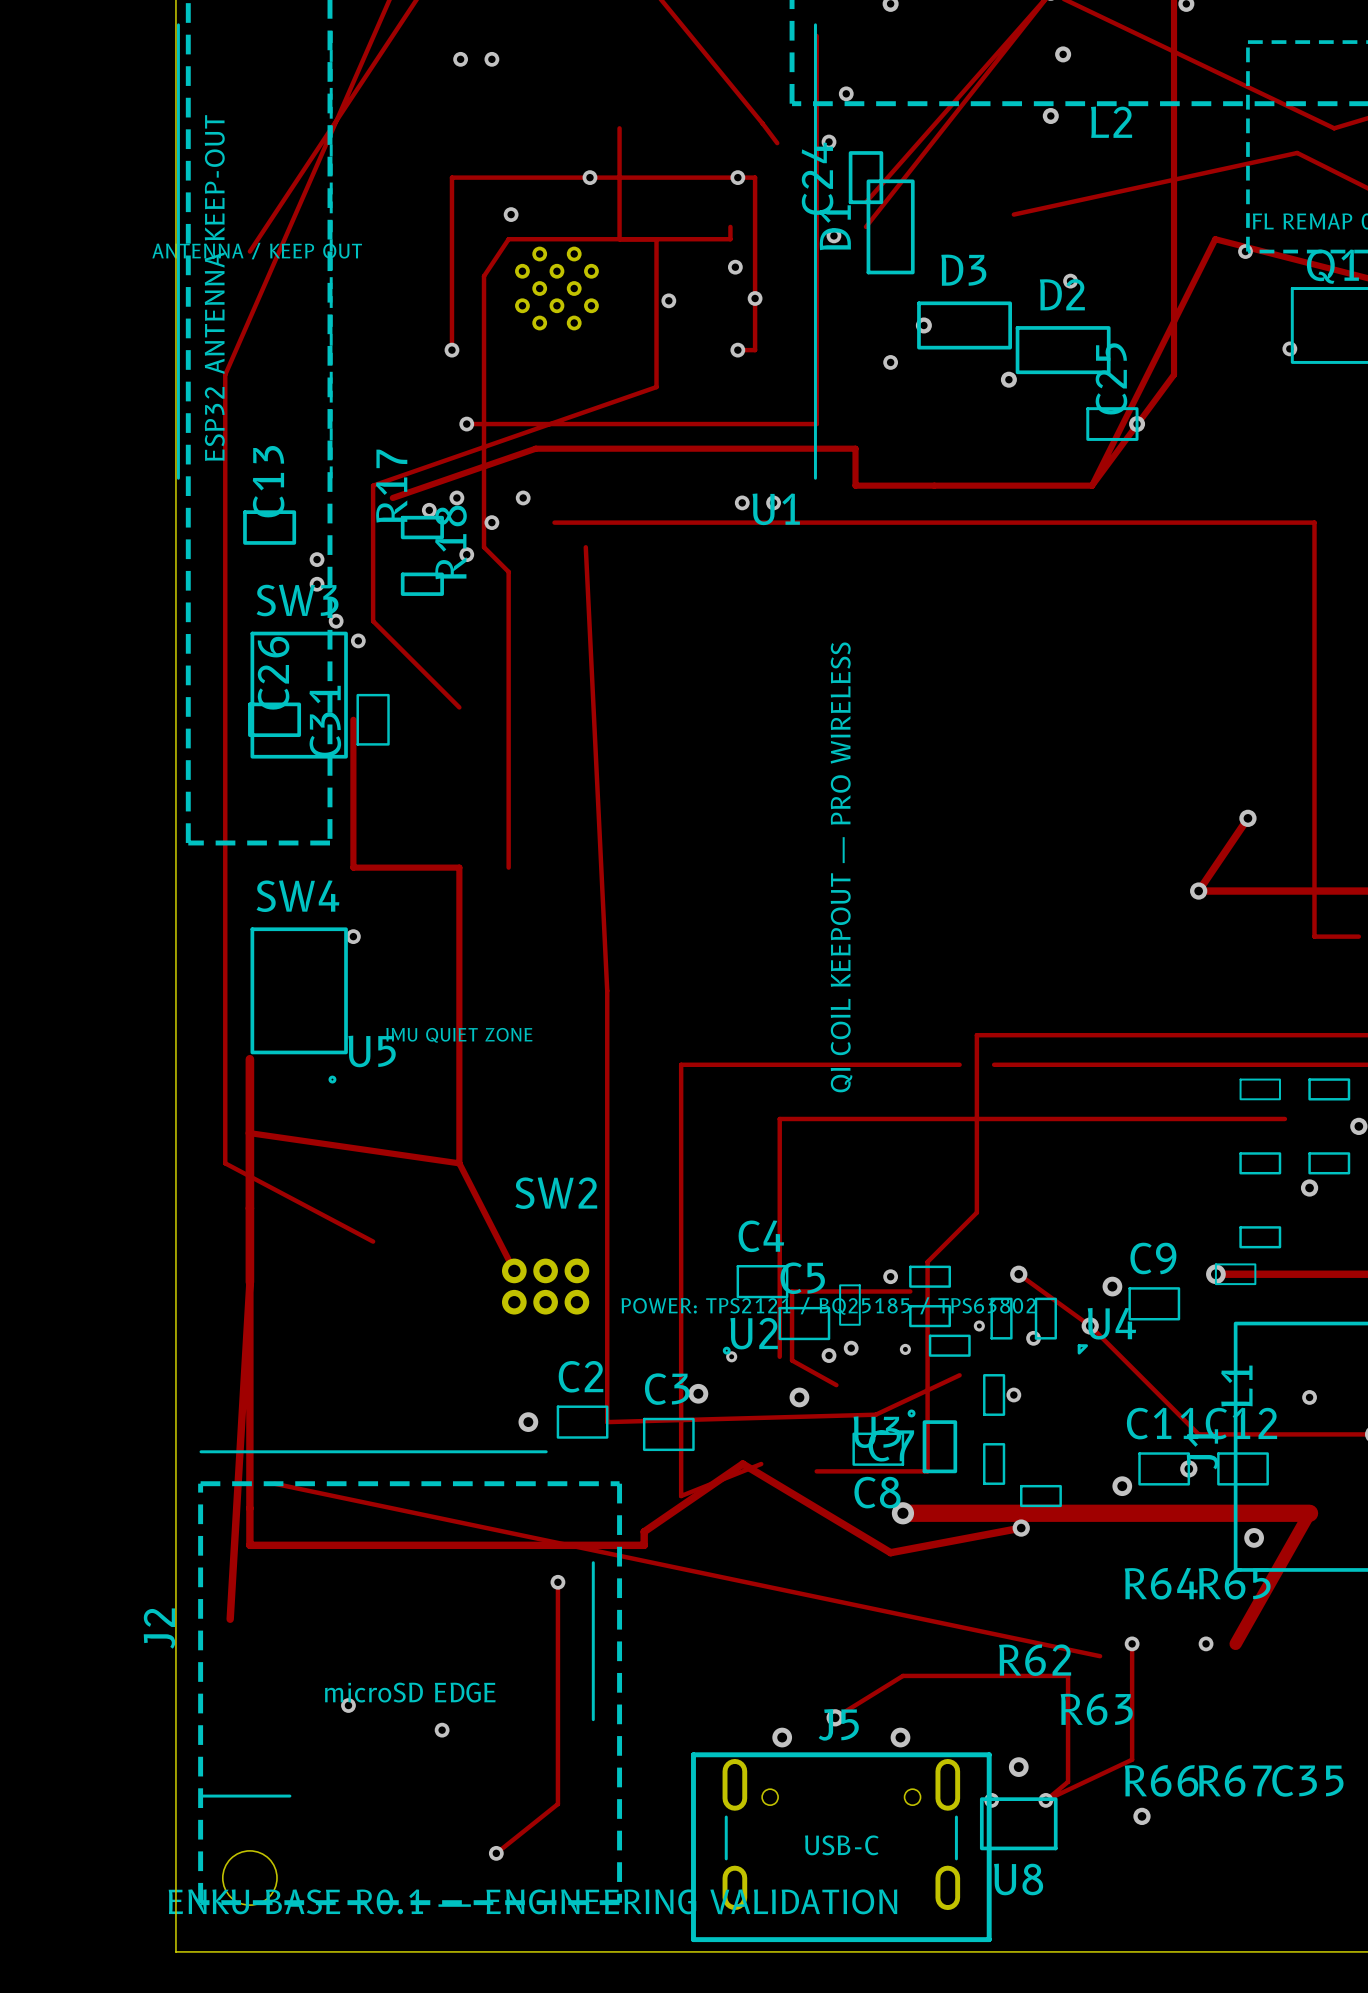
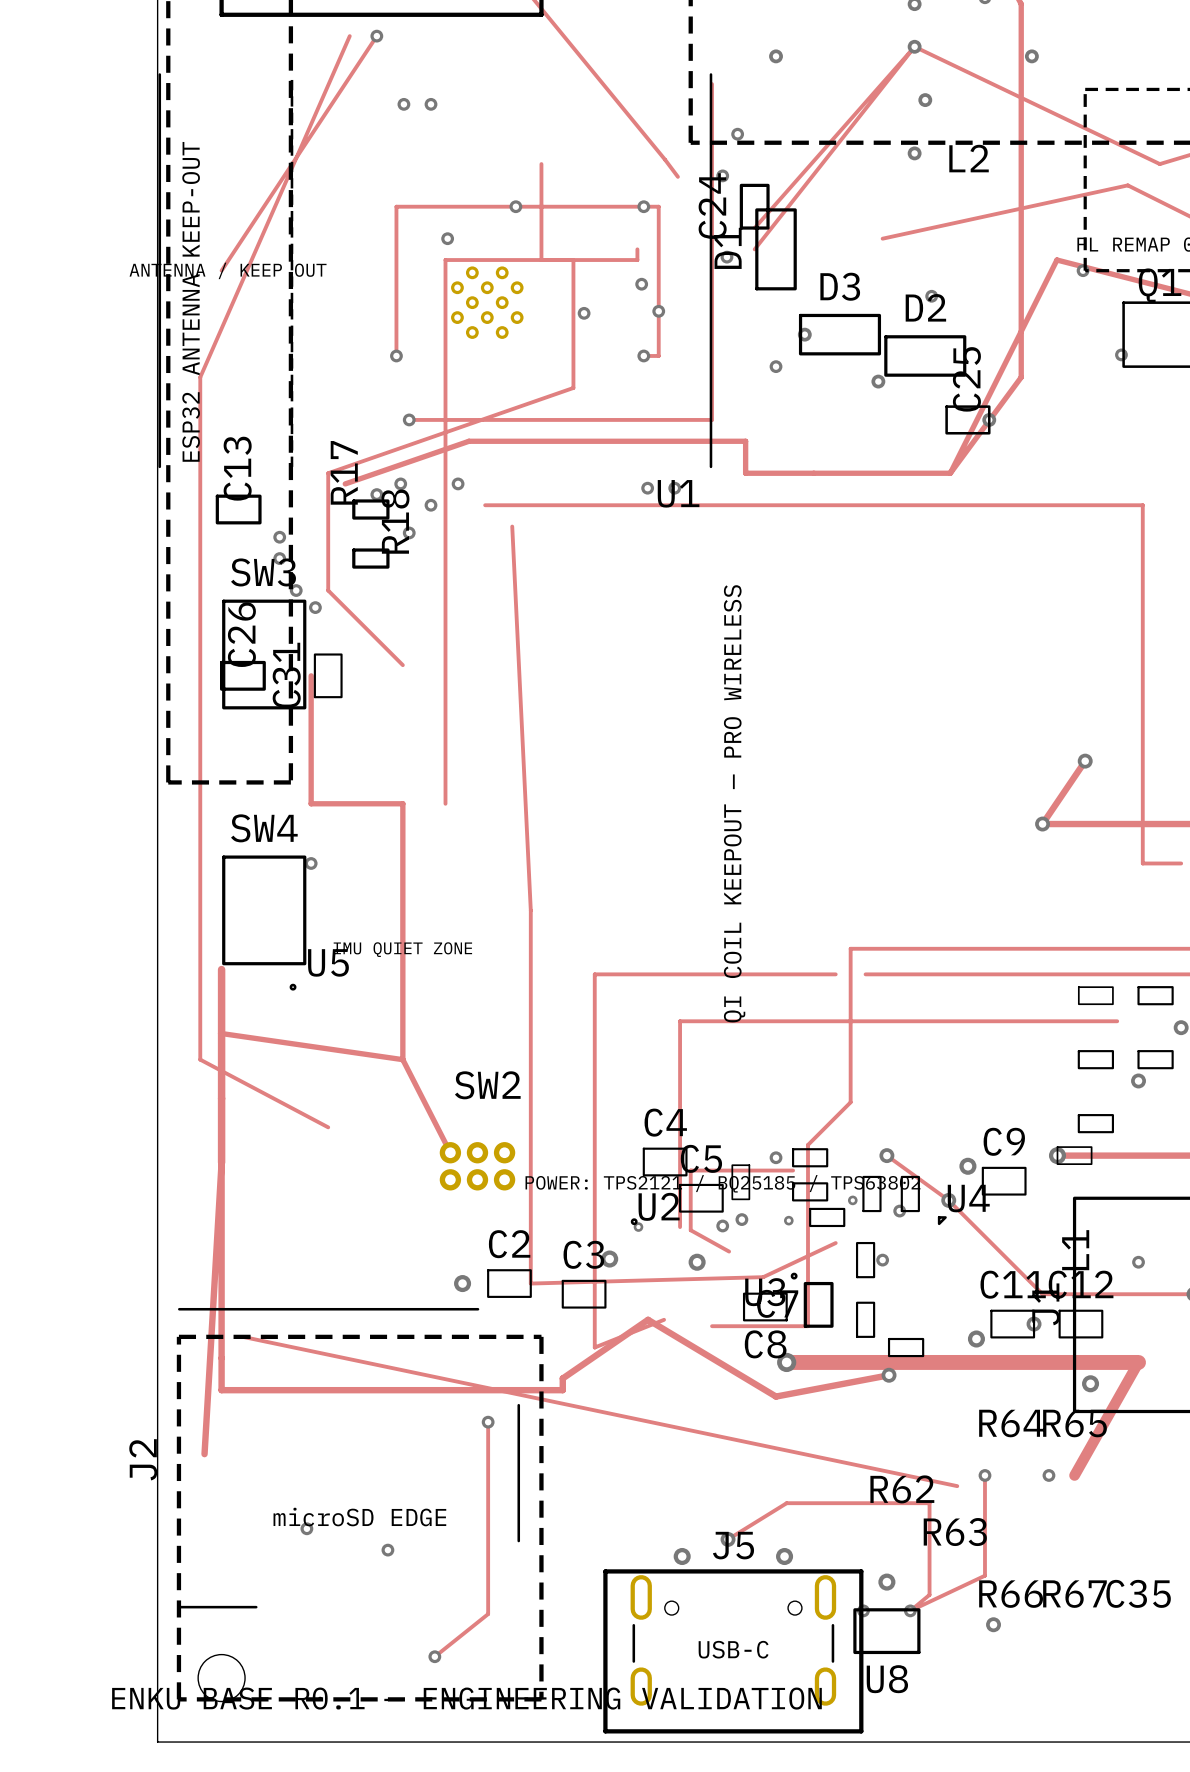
track: (508, 239) (484, 276) (484, 547) (508, 571) -> (445, 260) (445, 547)

